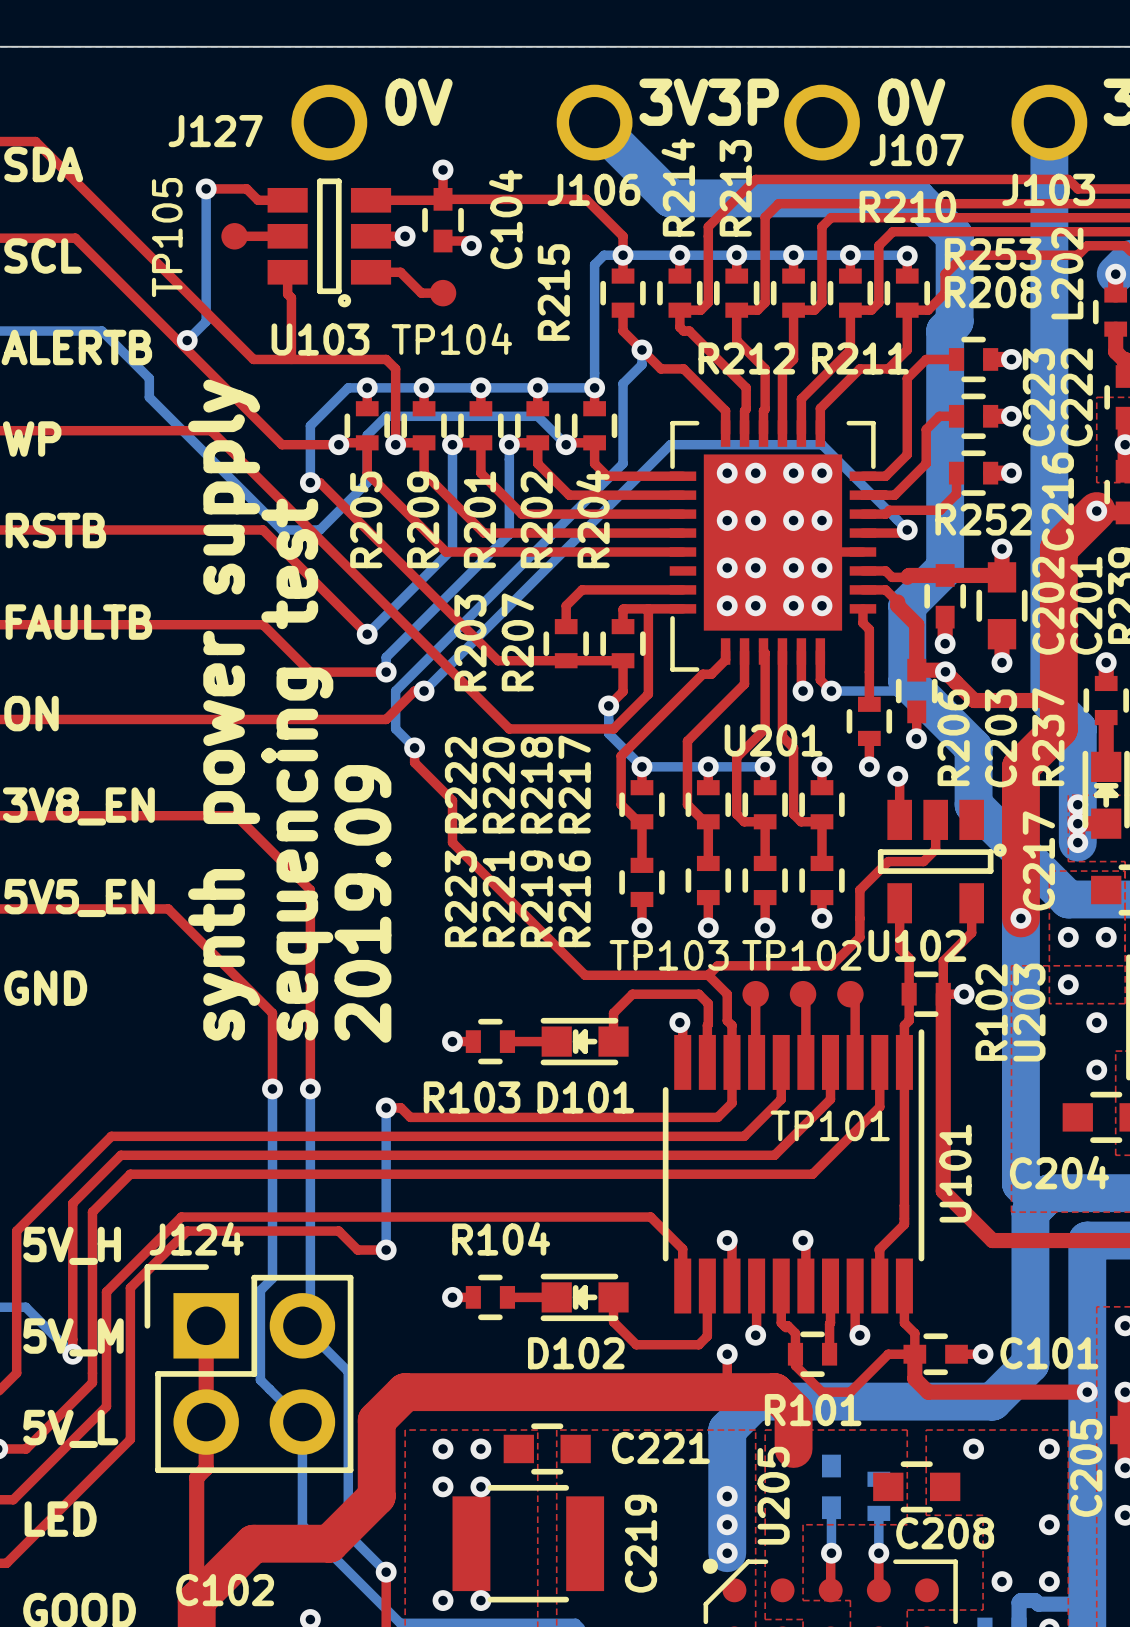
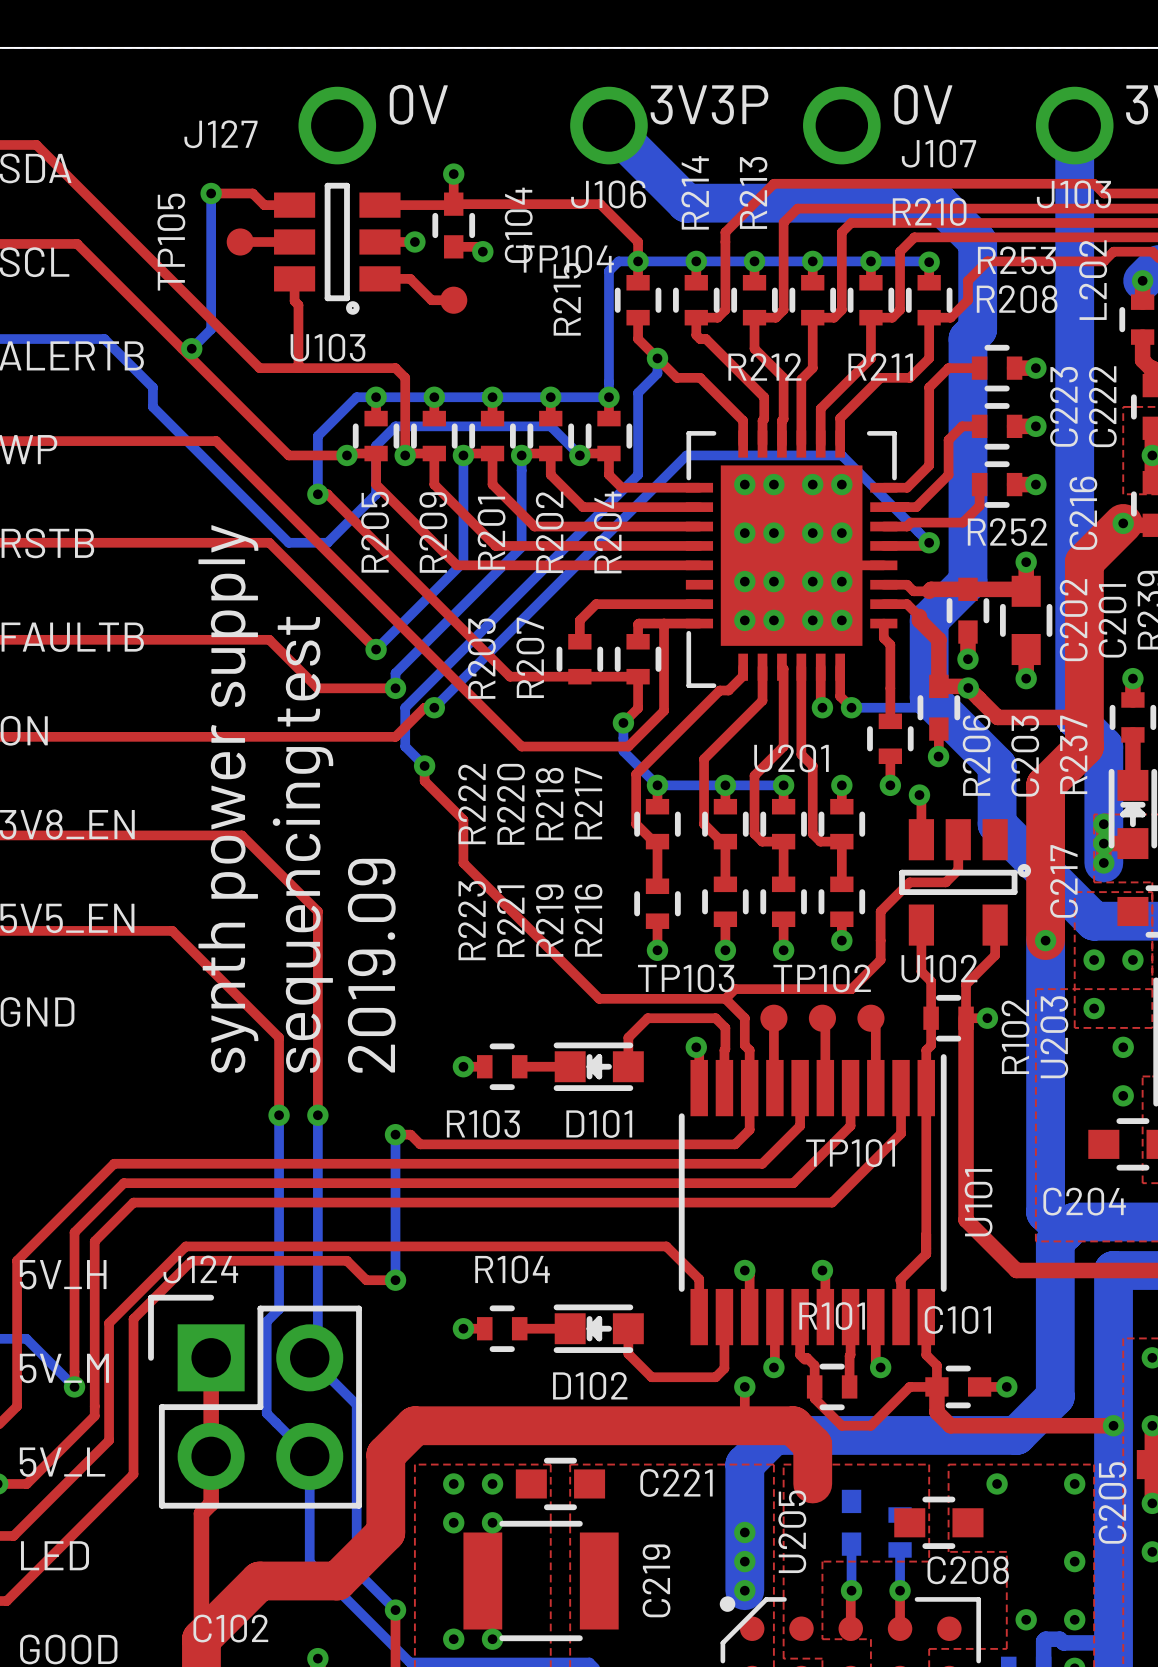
TP104 name position: TP104 (451, 338) -> TP104 (564, 259)
C101 name position: C101 (1049, 1353) -> C101 (957, 1319)
R101 name position: R101 (813, 1410) -> R101 (832, 1316)

